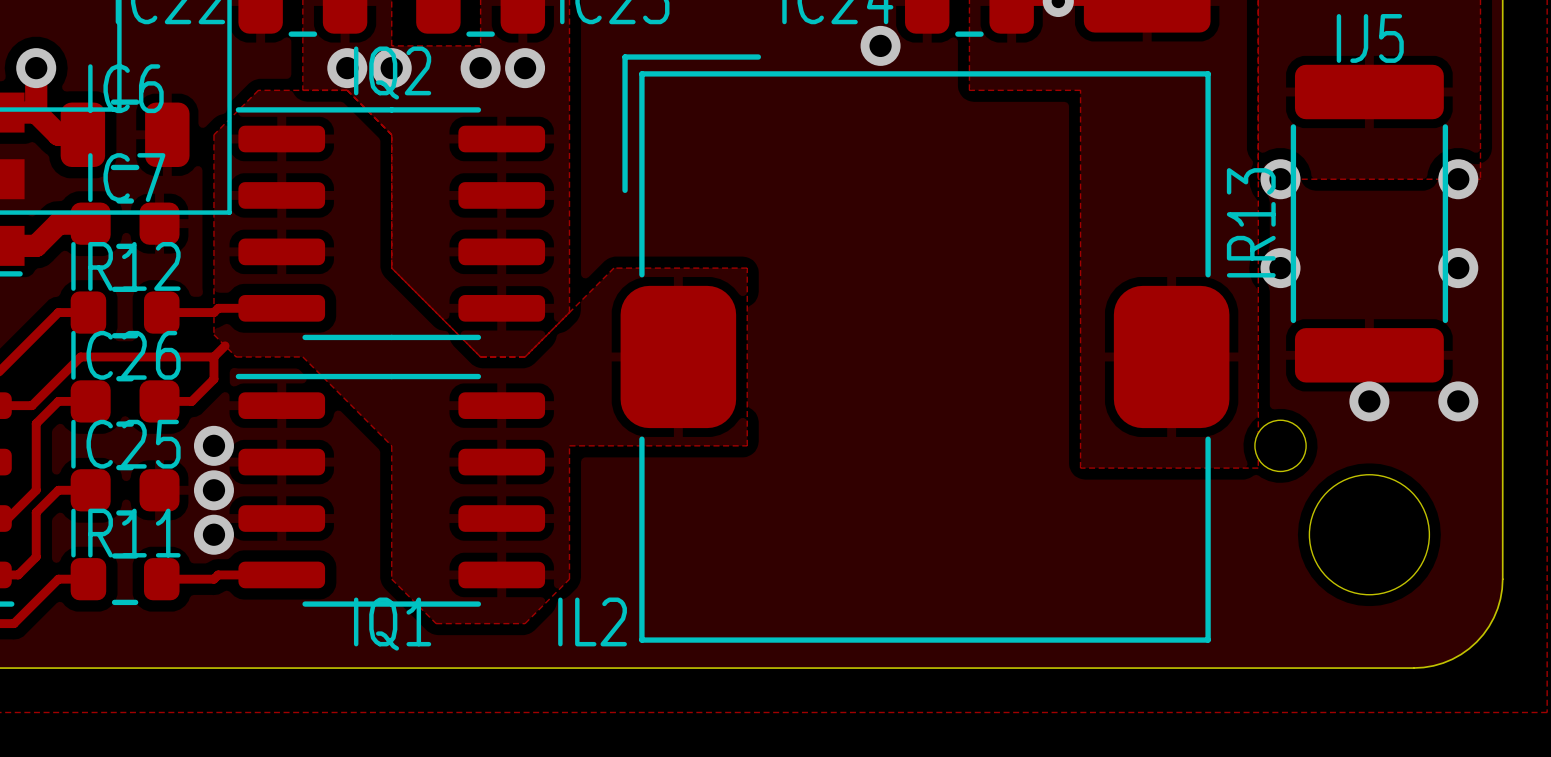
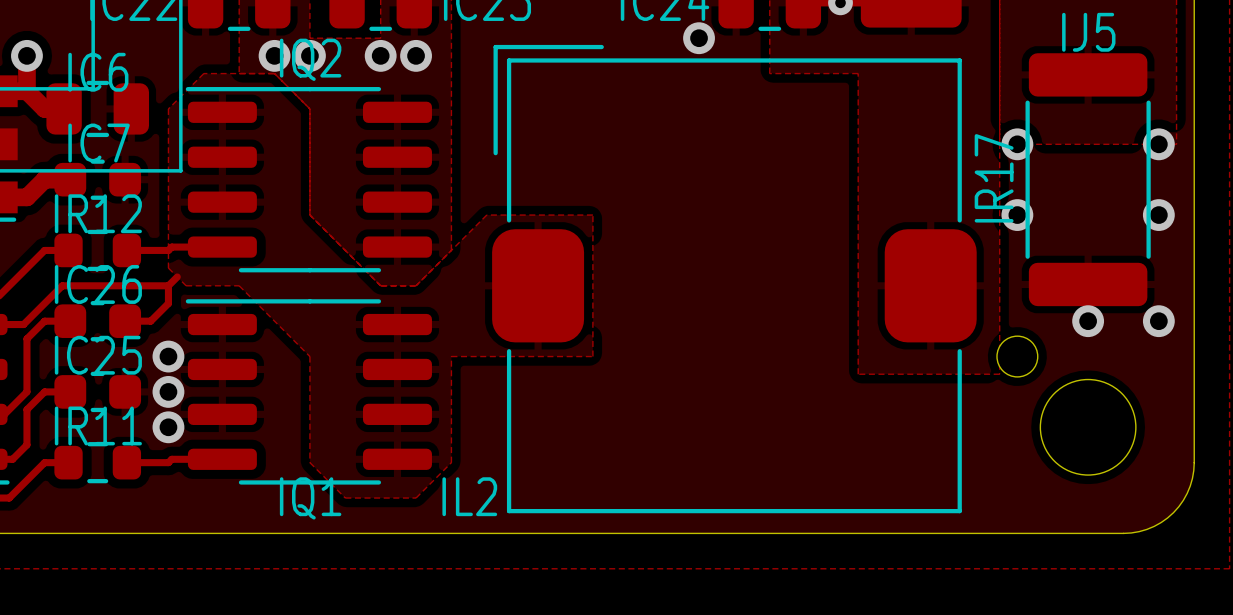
IR13 name: IR13 (1251, 222) -> IR17 (994, 178)

